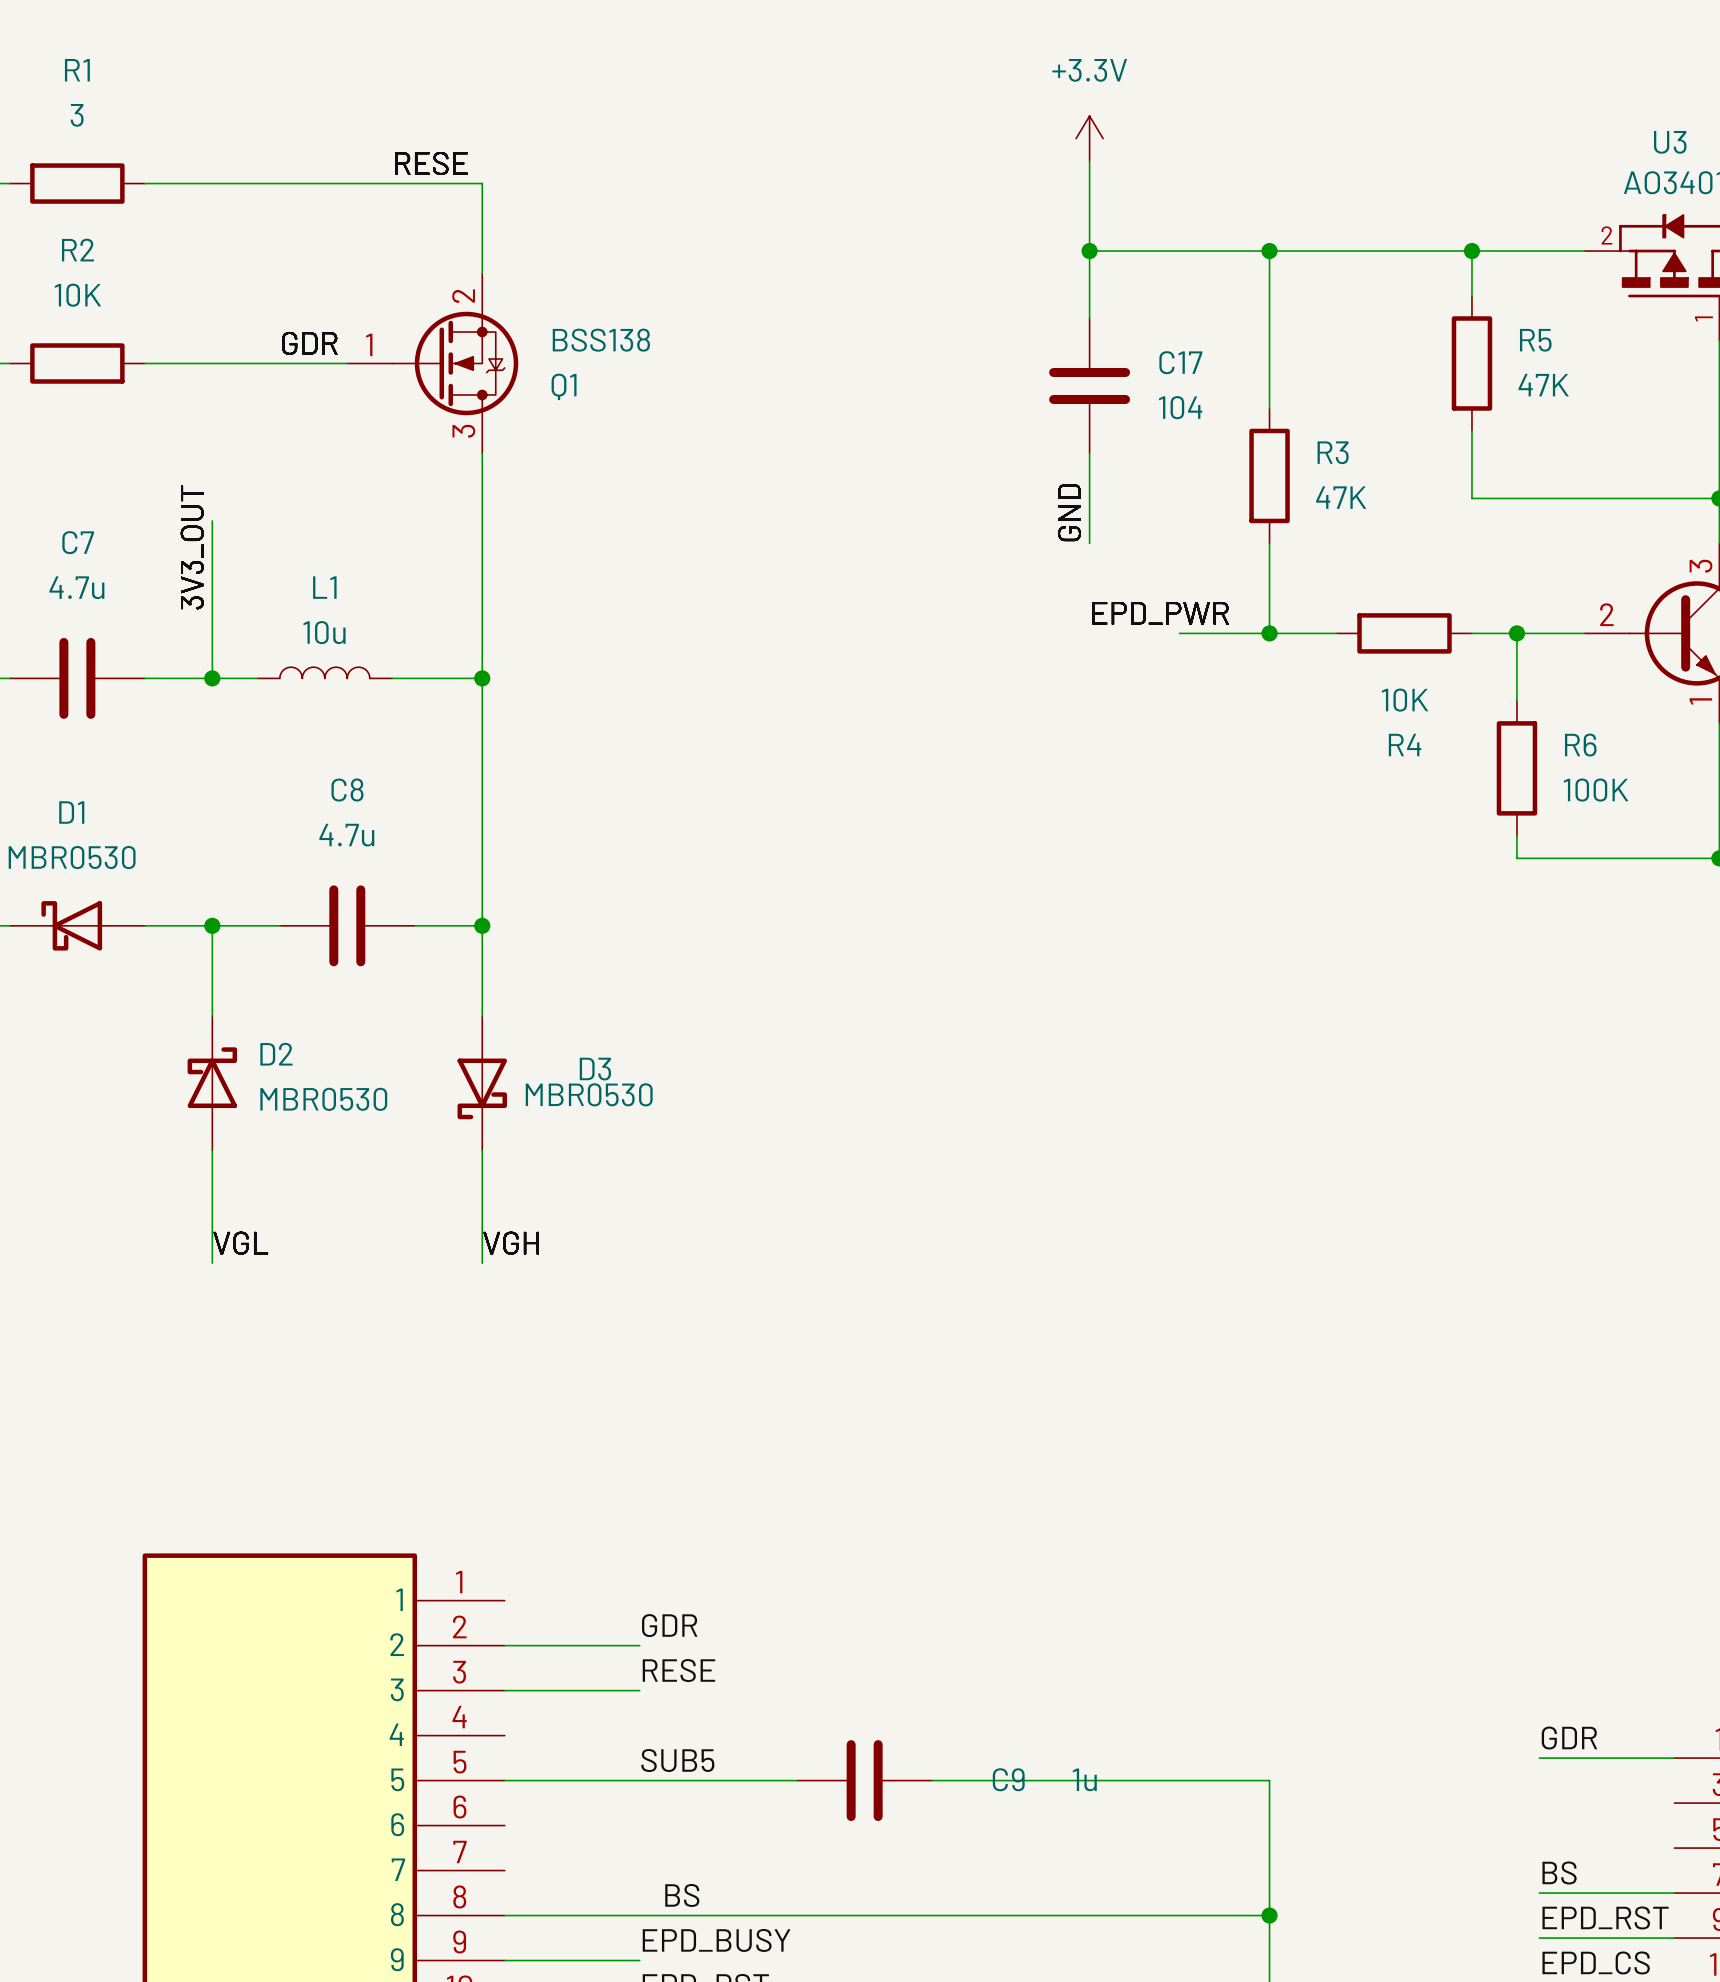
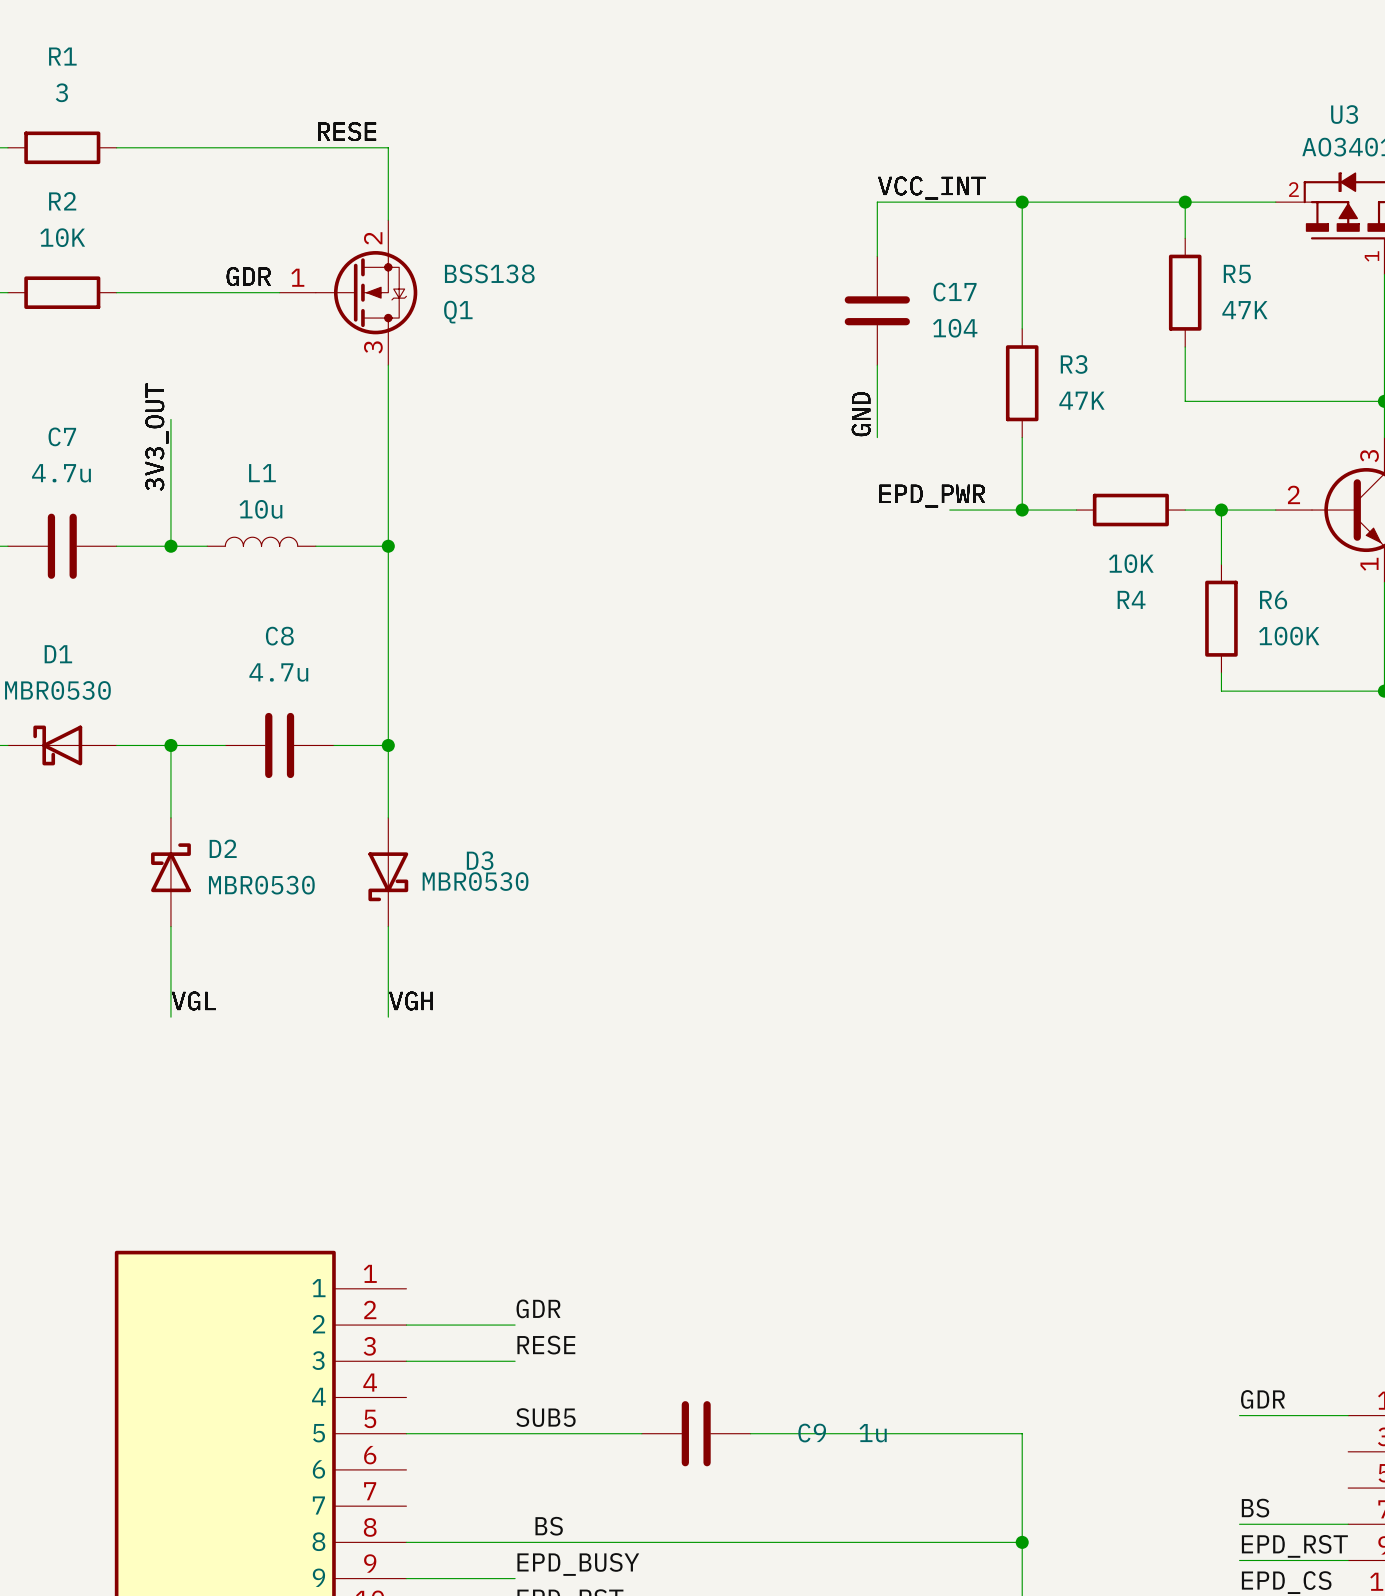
power symbol: +3.3V (1089, 138) -> none
wire: (1089, 161) (1089, 251) -> none
label: none -> VCC_INT (931, 188)
junction: (1089, 251) -> none

